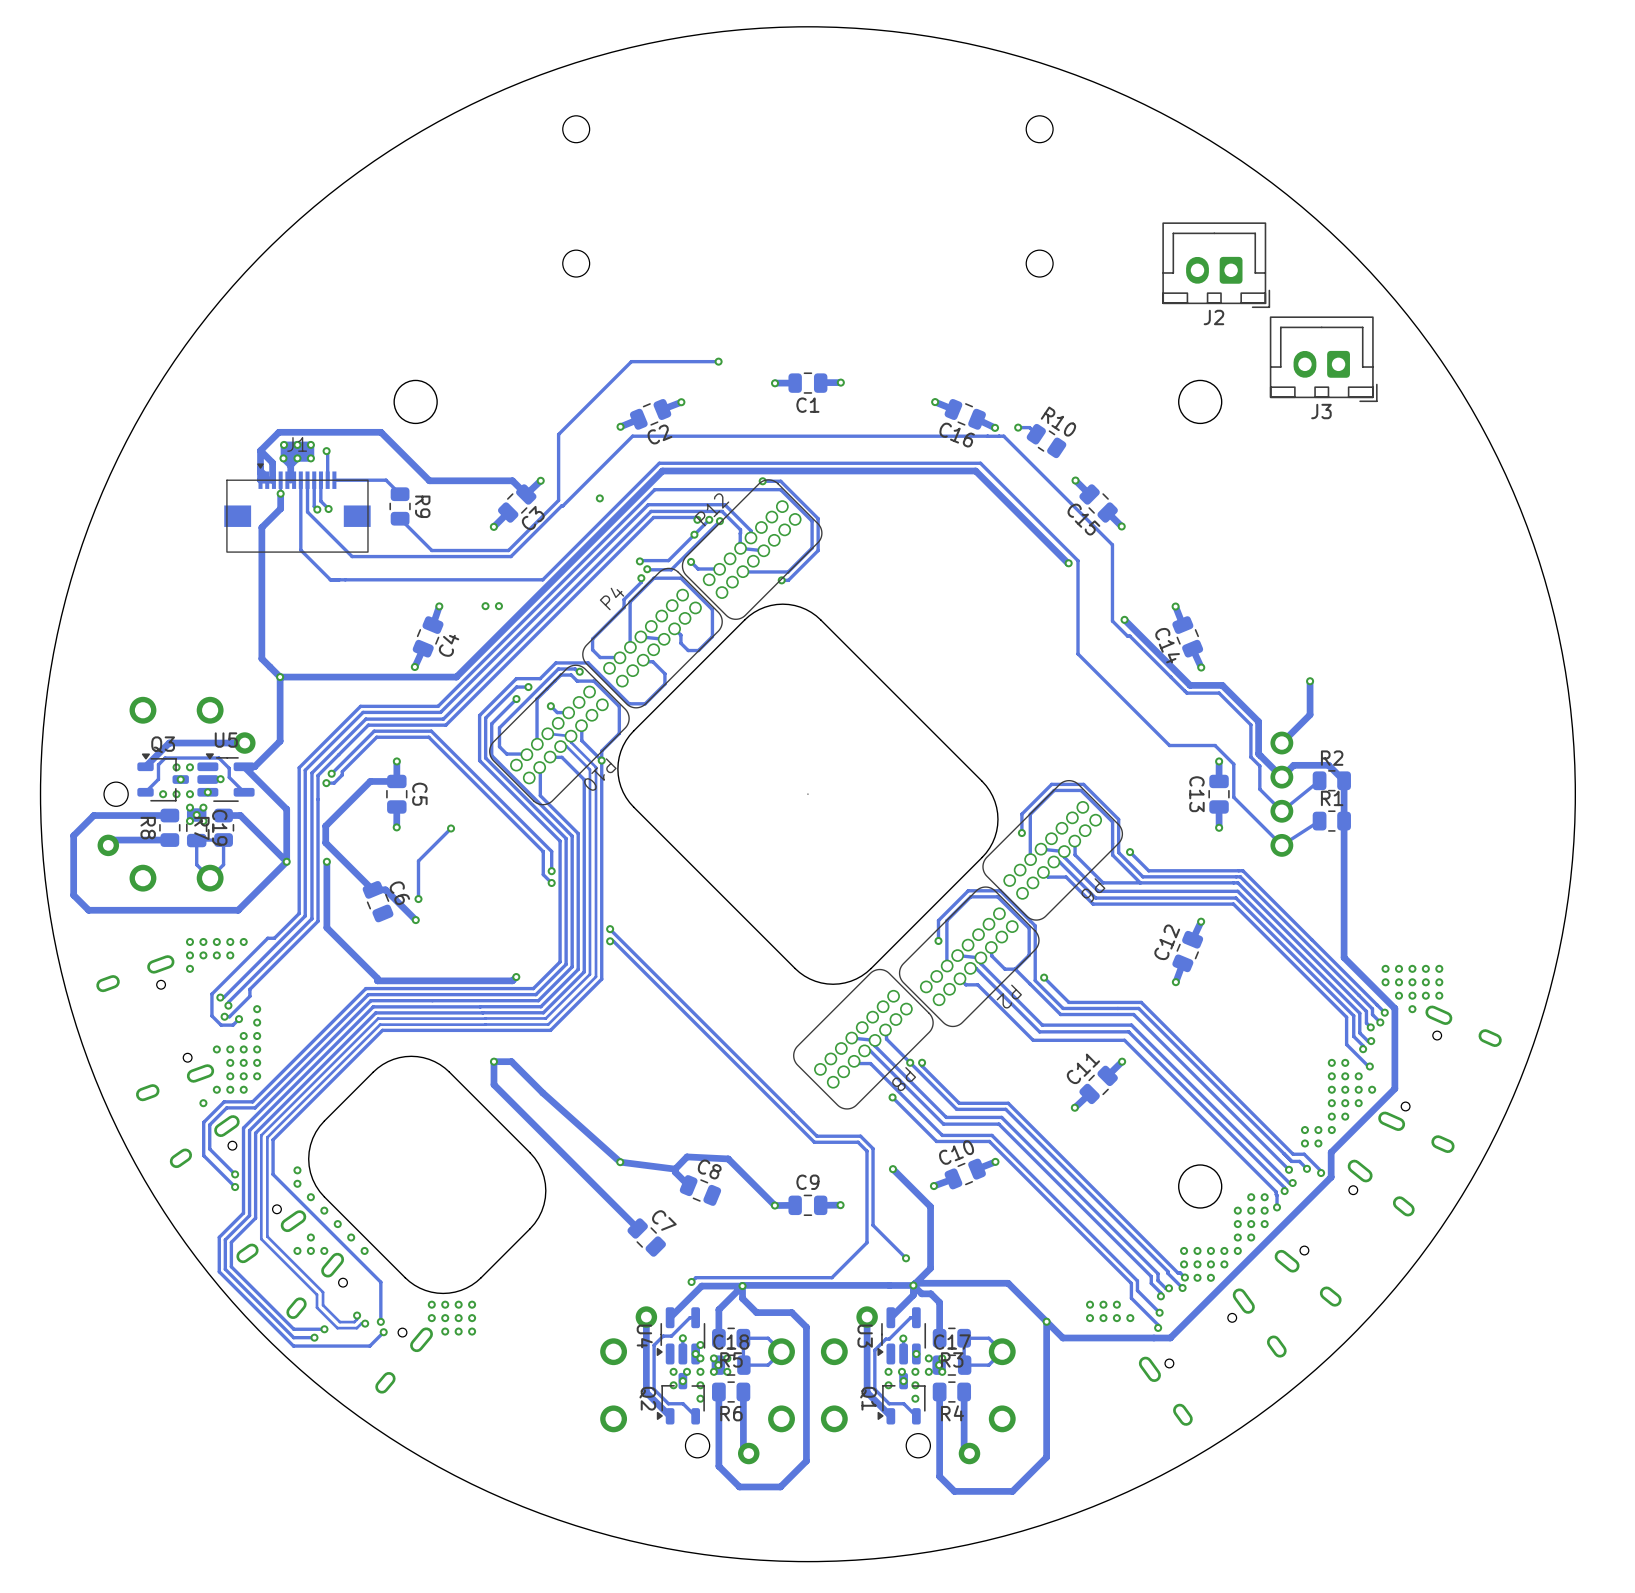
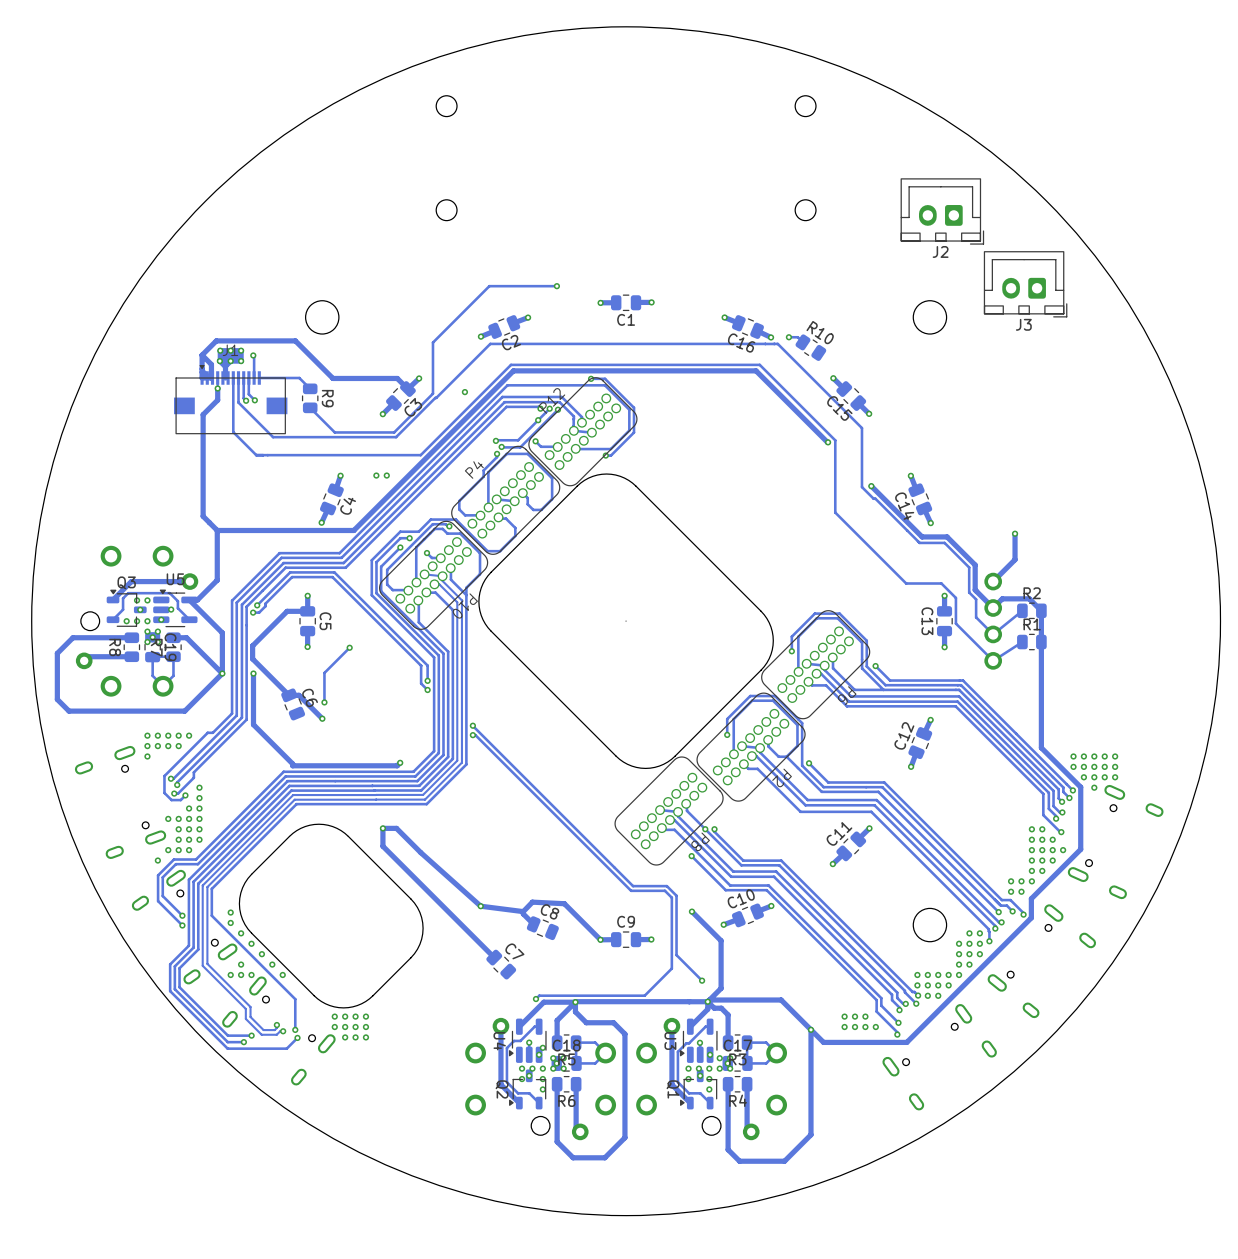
via: (280, 677) -> none
via: (601, 760) -> none
via: (700, 1358) -> none

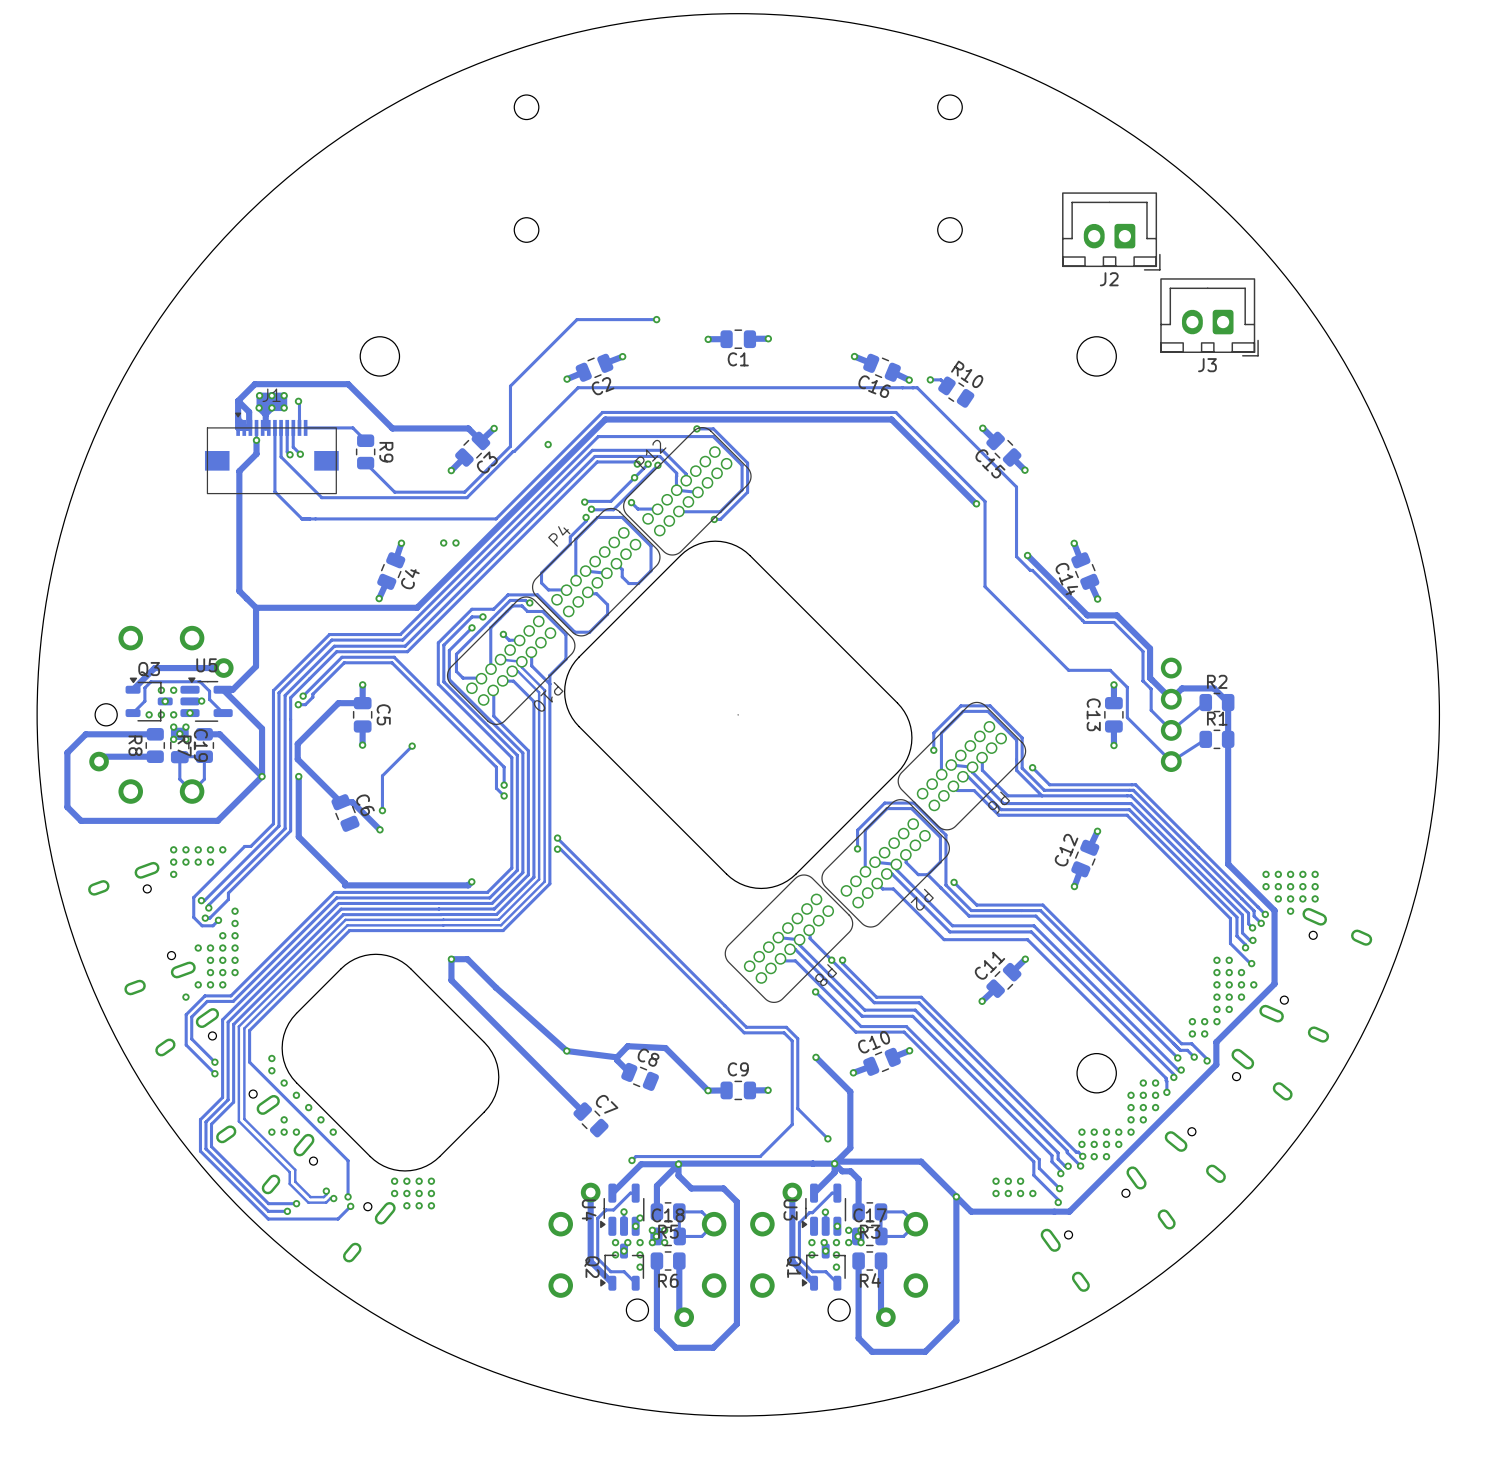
track: (1015, 533) (1015, 559) (993, 581) -> none
via: (1015, 533) -> none

